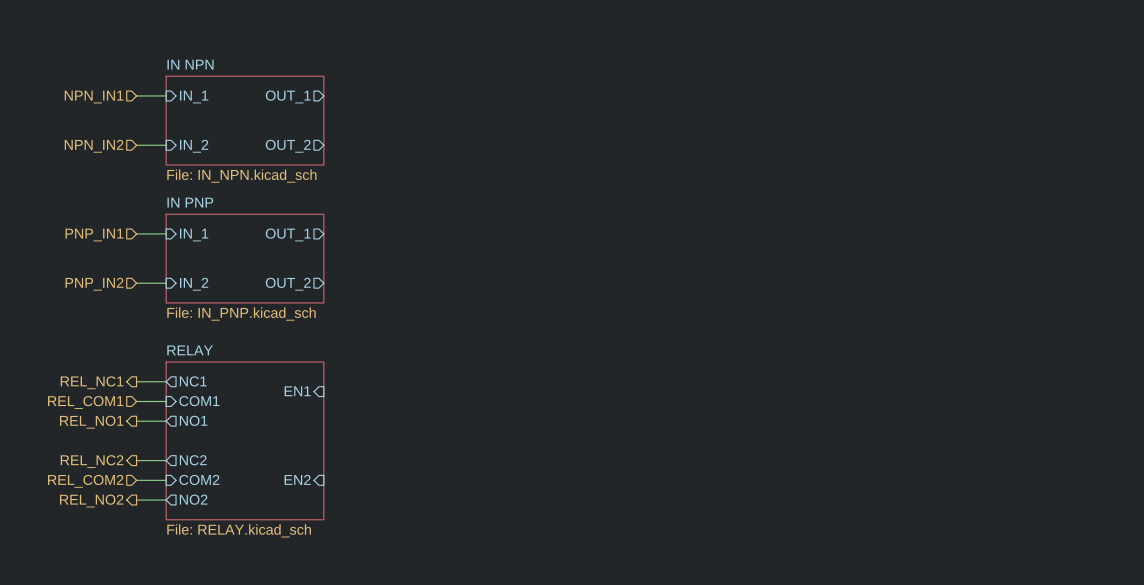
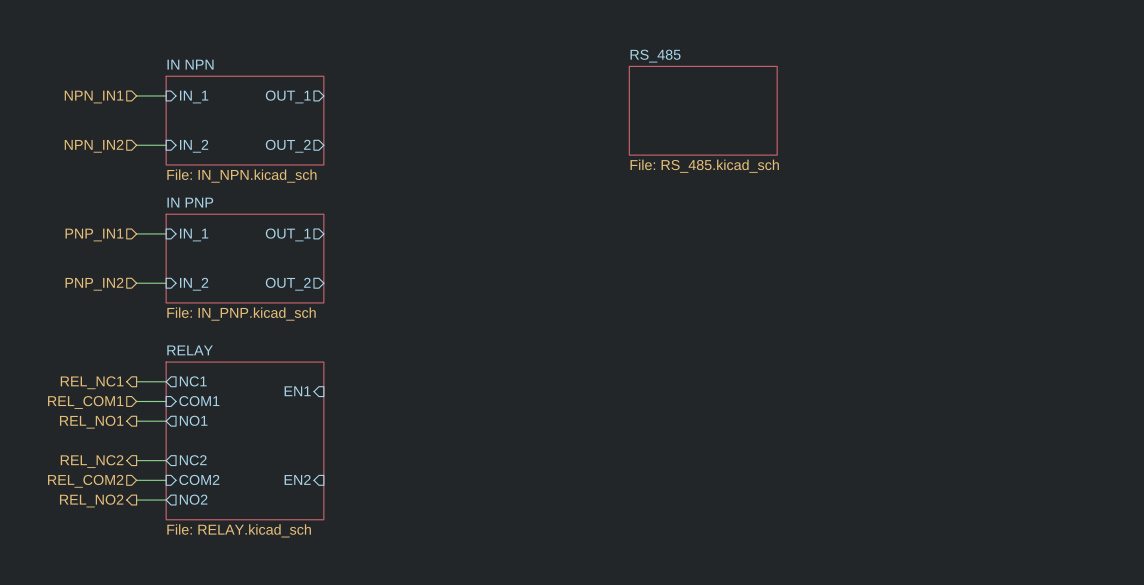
sheet RS_485: none -> File: RS_485.kicad_sch (703, 110)

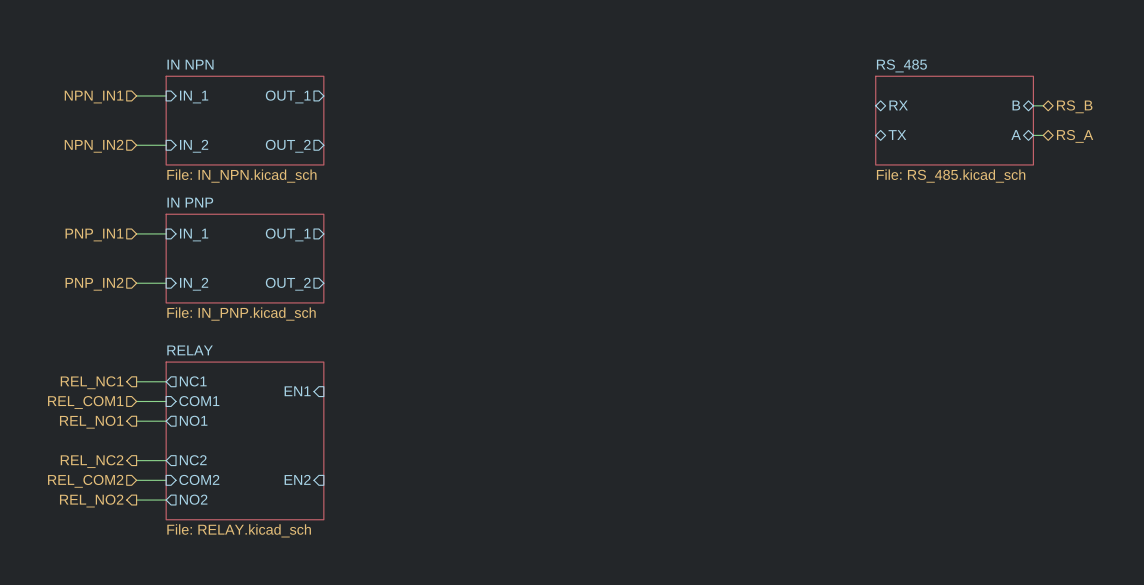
sheet RS_485 shape: [628, 65, 778, 156] -> [875, 75, 1035, 166]
sheet pin: none -> RX (898, 105)
sheet pin: none -> B (1016, 105)
wire: none -> (1033, 105) (1043, 105)
hierarchical label: none -> RS_B (1074, 106)
sheet pin: none -> TX (897, 135)
sheet pin: none -> A (1016, 135)
wire: none -> (1033, 135) (1043, 135)
hierarchical label: none -> RS_A (1075, 136)

